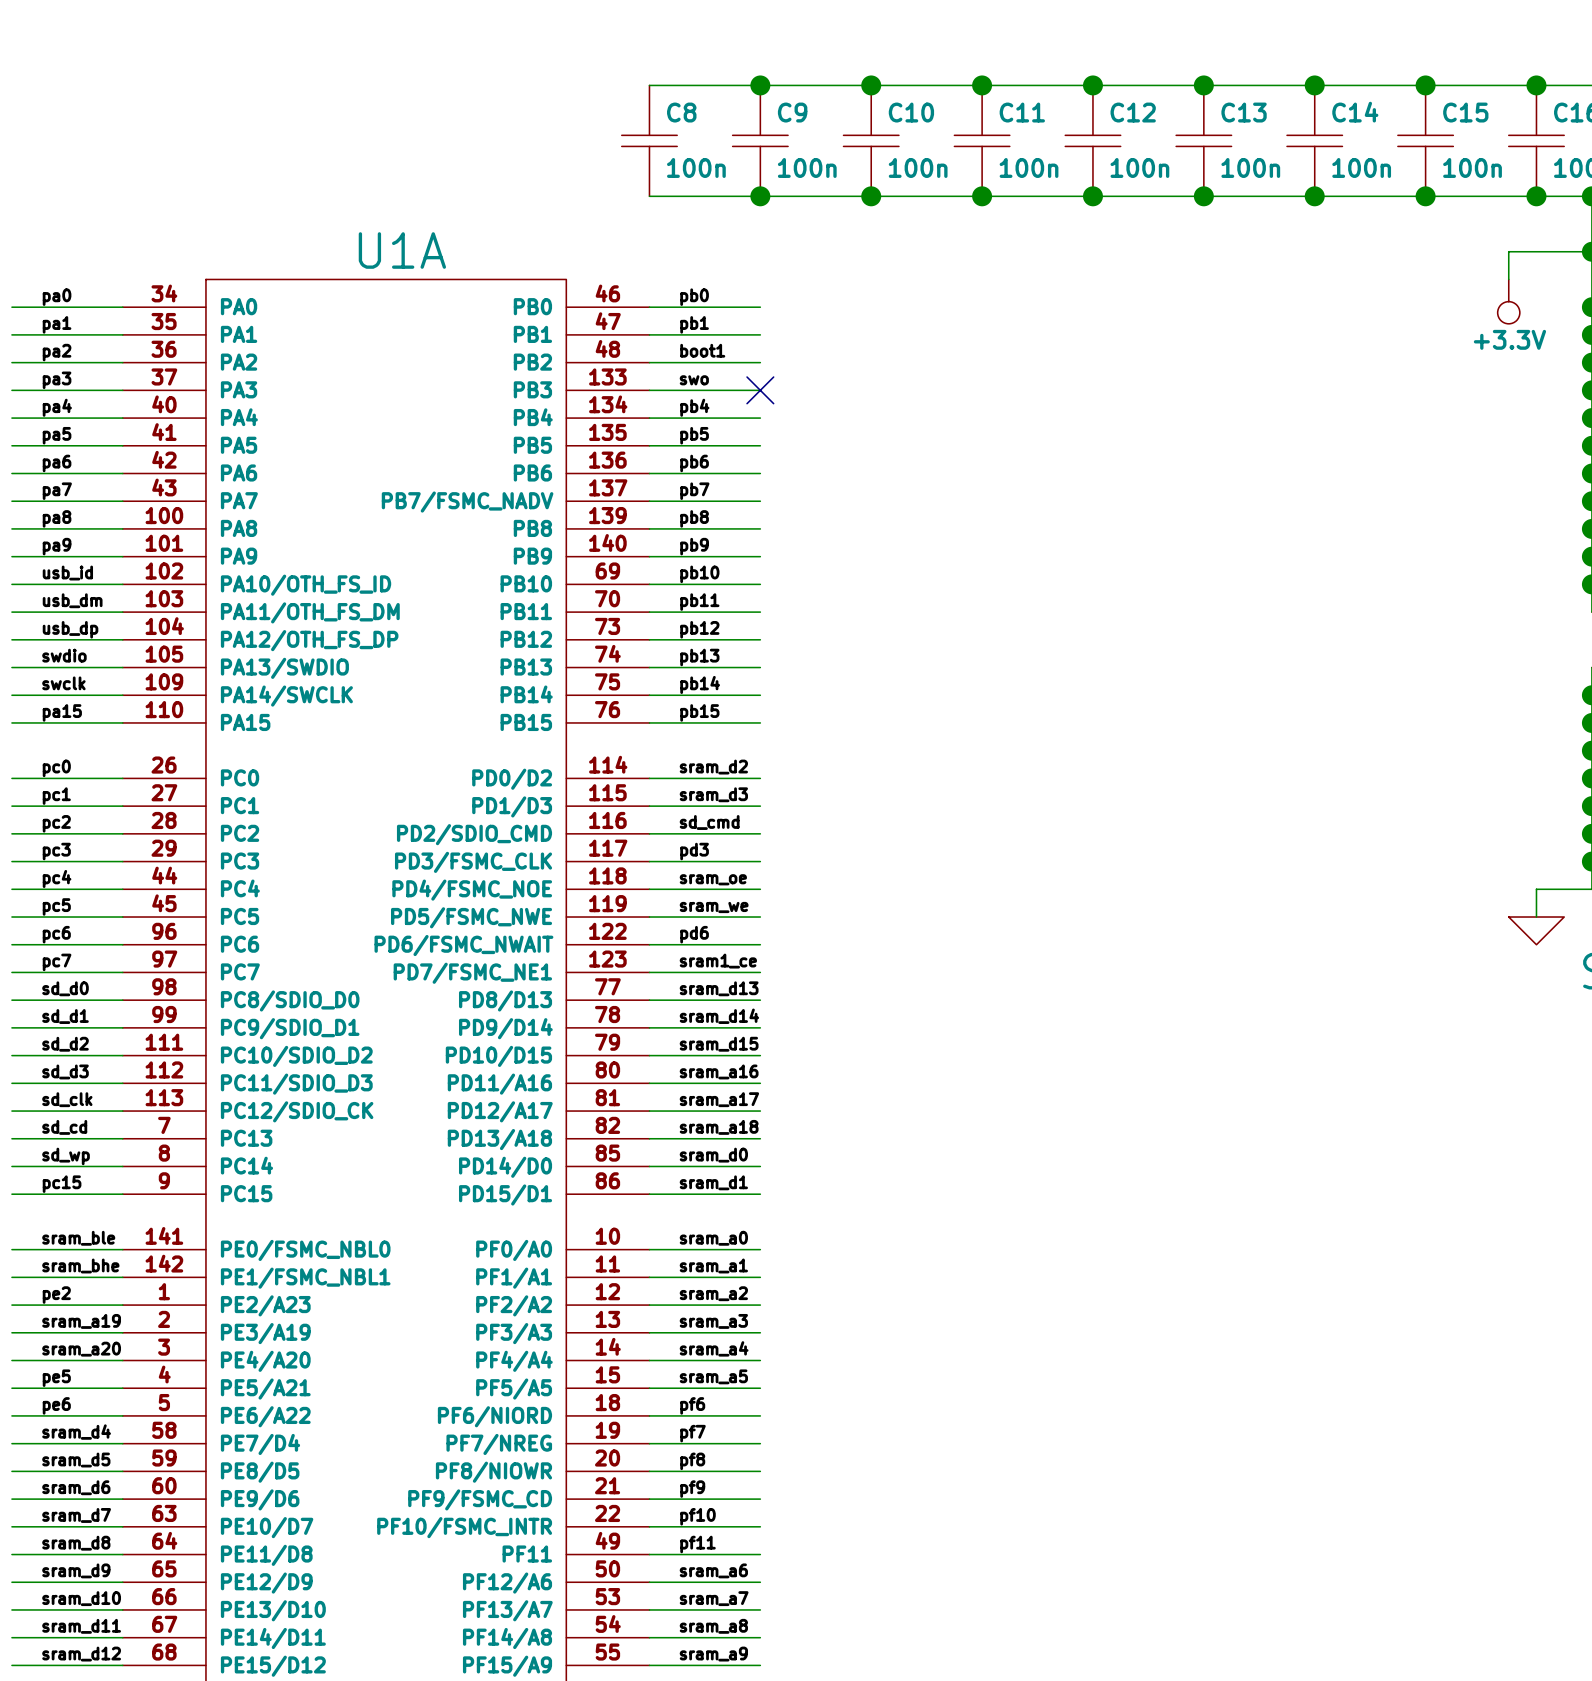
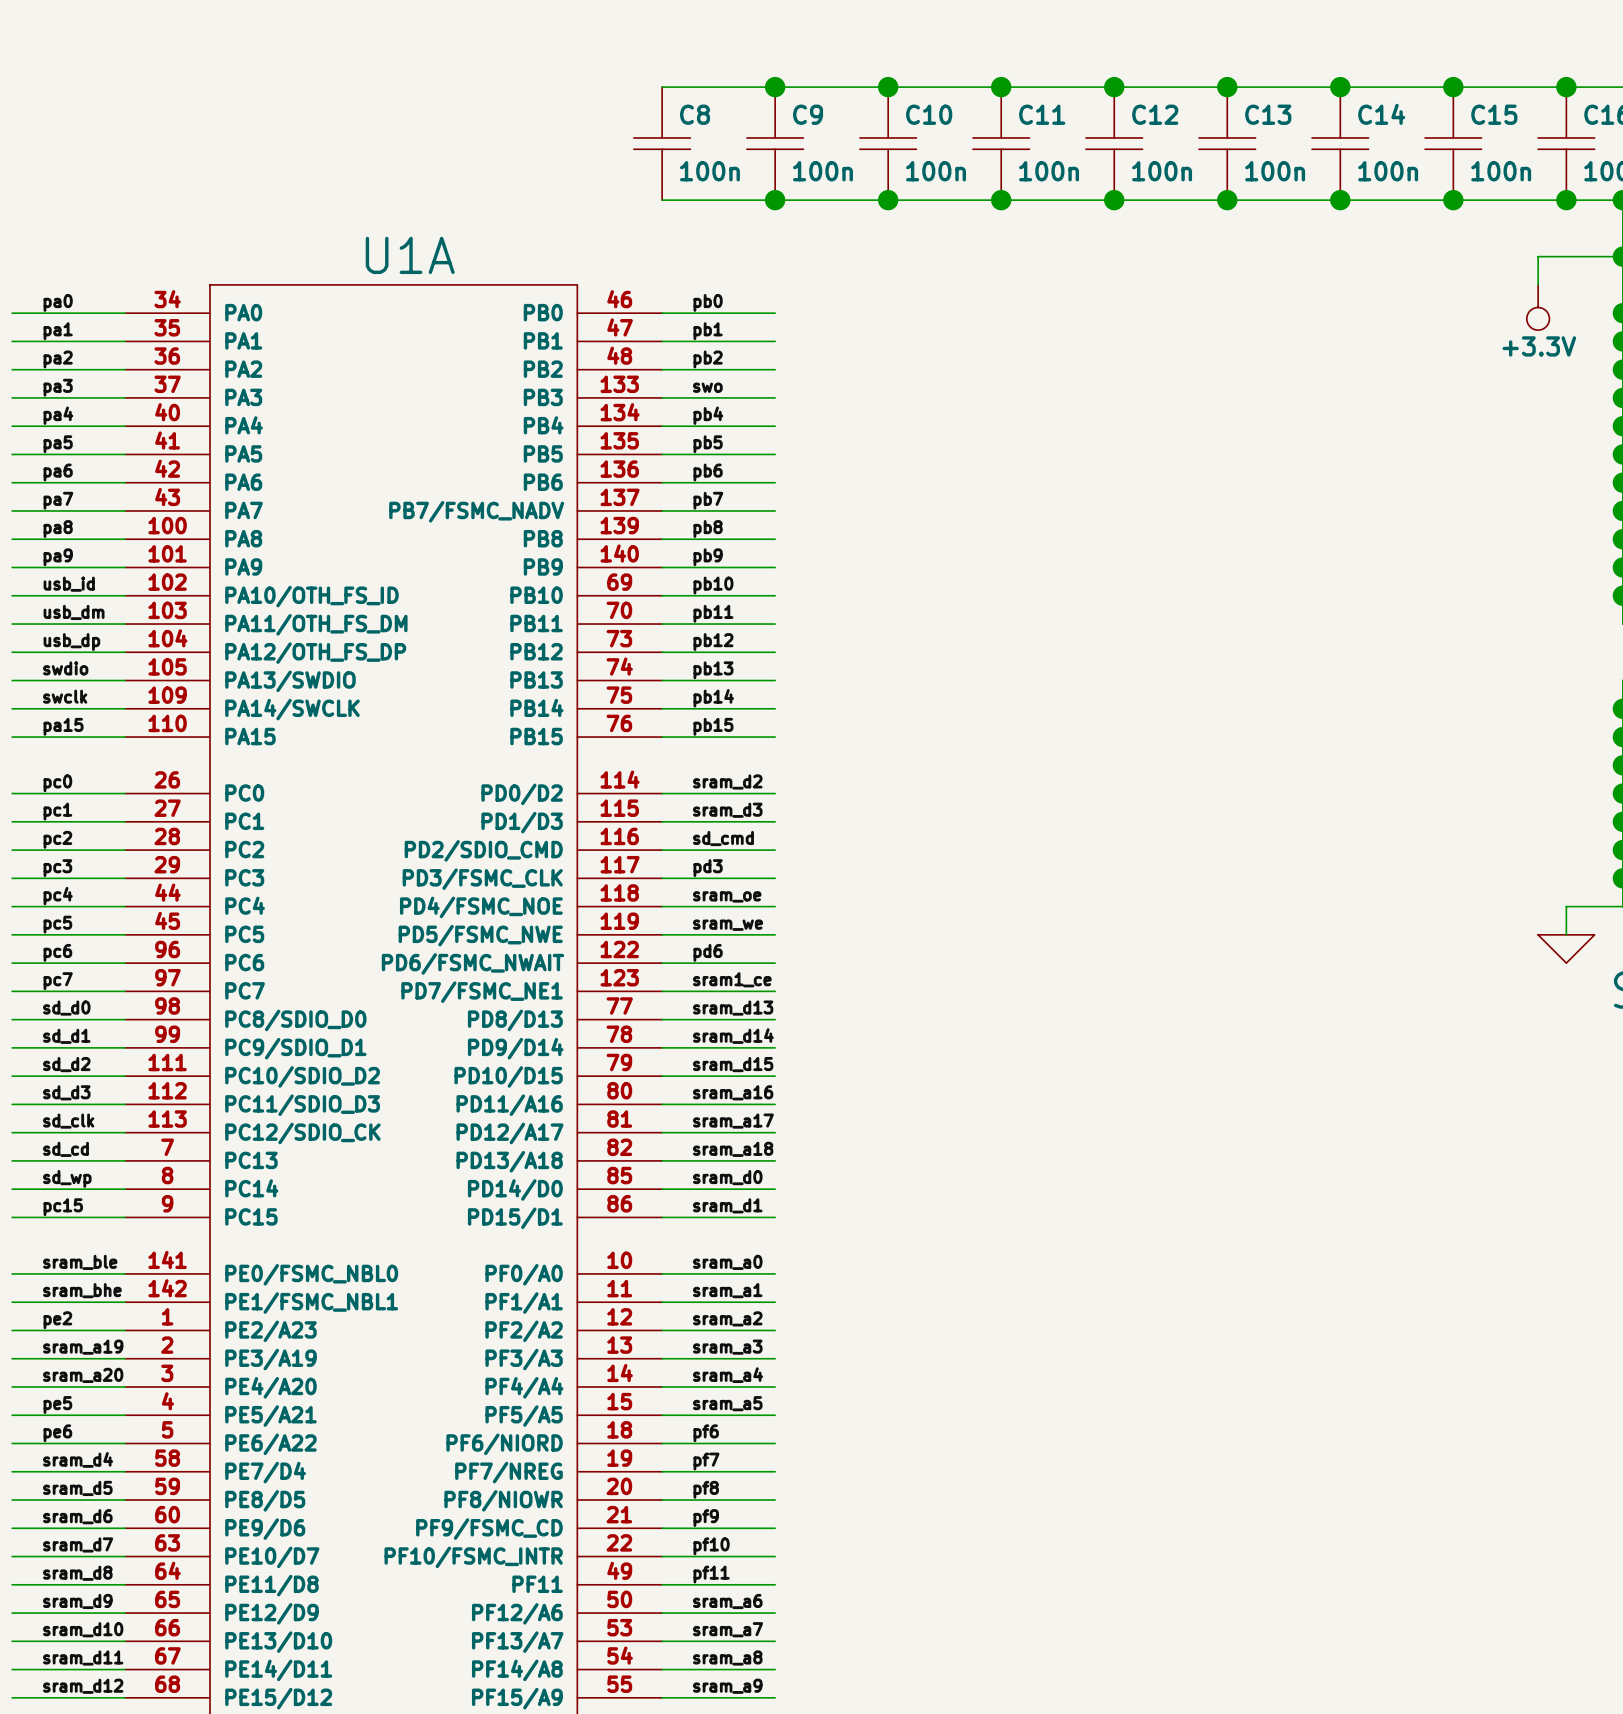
label: boot1 (702, 350) -> pb2 (708, 359)
no-connect mark: (760, 390) -> none

